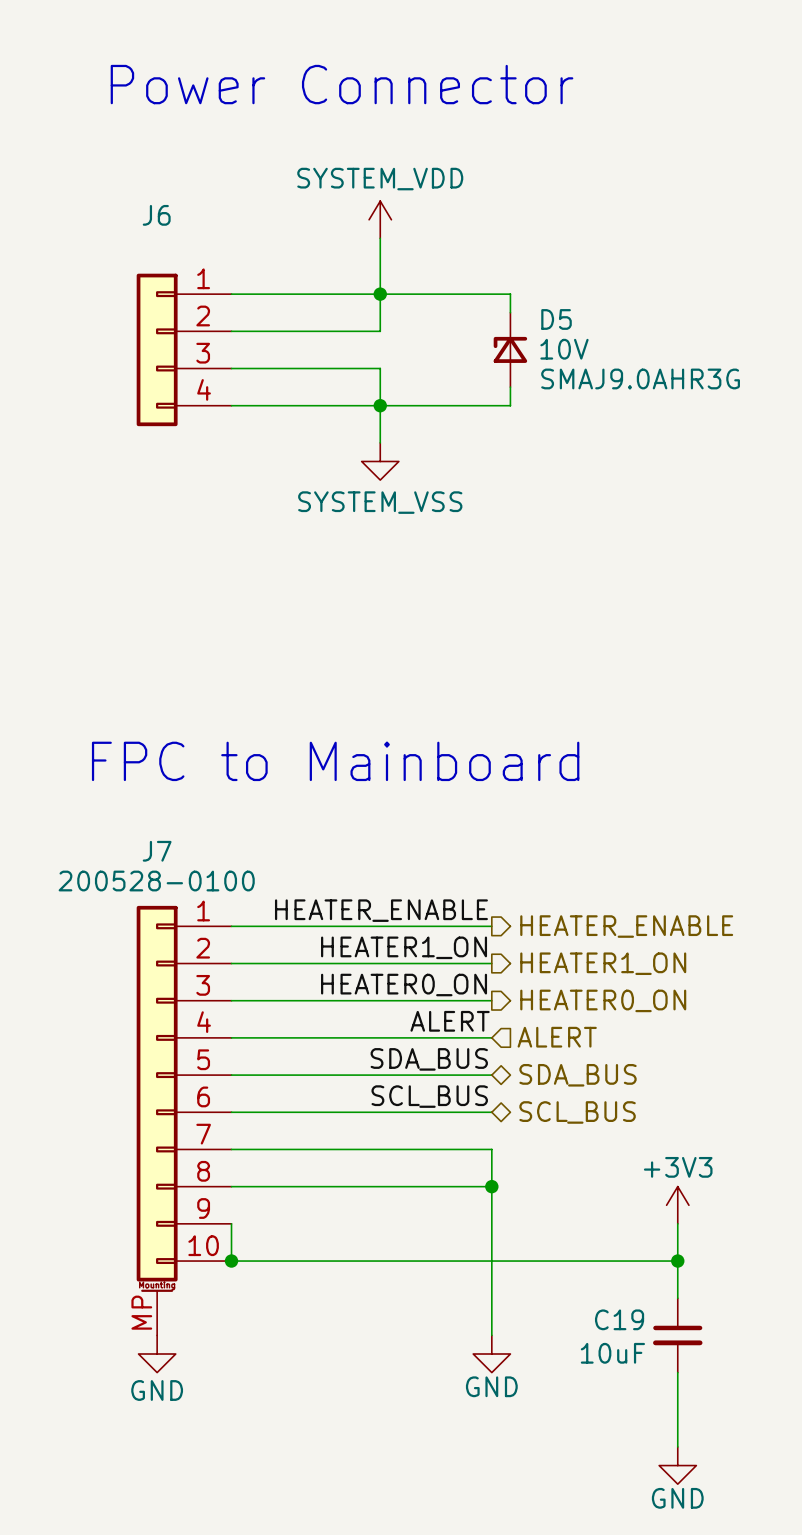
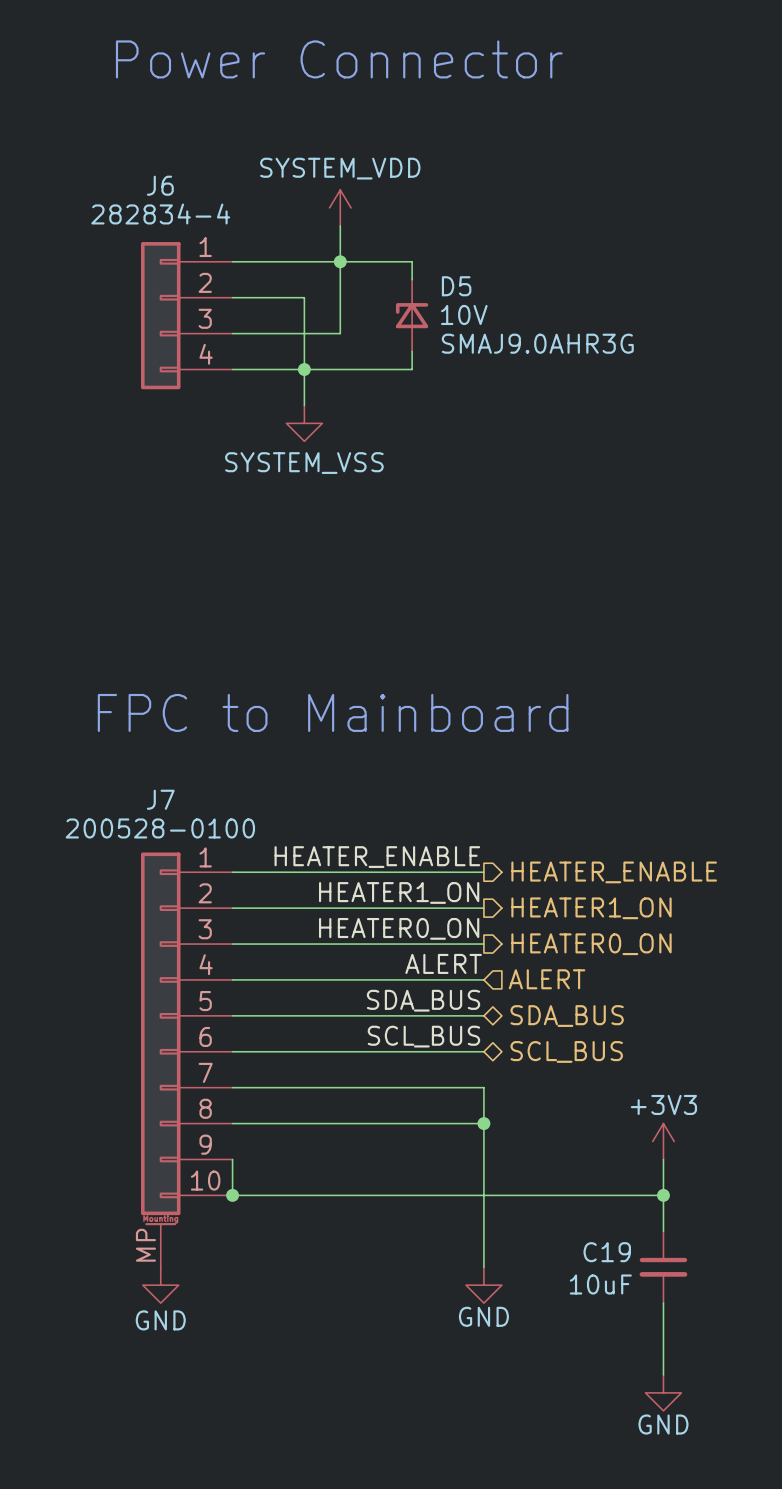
power symbol position: SYSTEM_VDD (380, 219) -> SYSTEM_VDD (340, 207)
wire: (380, 238) (380, 331) (305, 331) -> (304, 405) (304, 297)
J6 value: none -> 282834-4 (160, 214)
junction position: (380, 294) -> (340, 261)
wire: (417, 294) (510, 294) (510, 312) -> (412, 261) (412, 279)
D5 position: (510, 349) -> (412, 315)
wire: (343, 368) (380, 368) (380, 442) -> (340, 333) (340, 225)
wire: (510, 387) (510, 405) (417, 405) -> (412, 351) (412, 369)
junction: none -> (304, 369)
junction: (380, 405) -> none
power symbol position: SYSTEM_VSS (380, 461) -> SYSTEM_VSS (304, 423)

